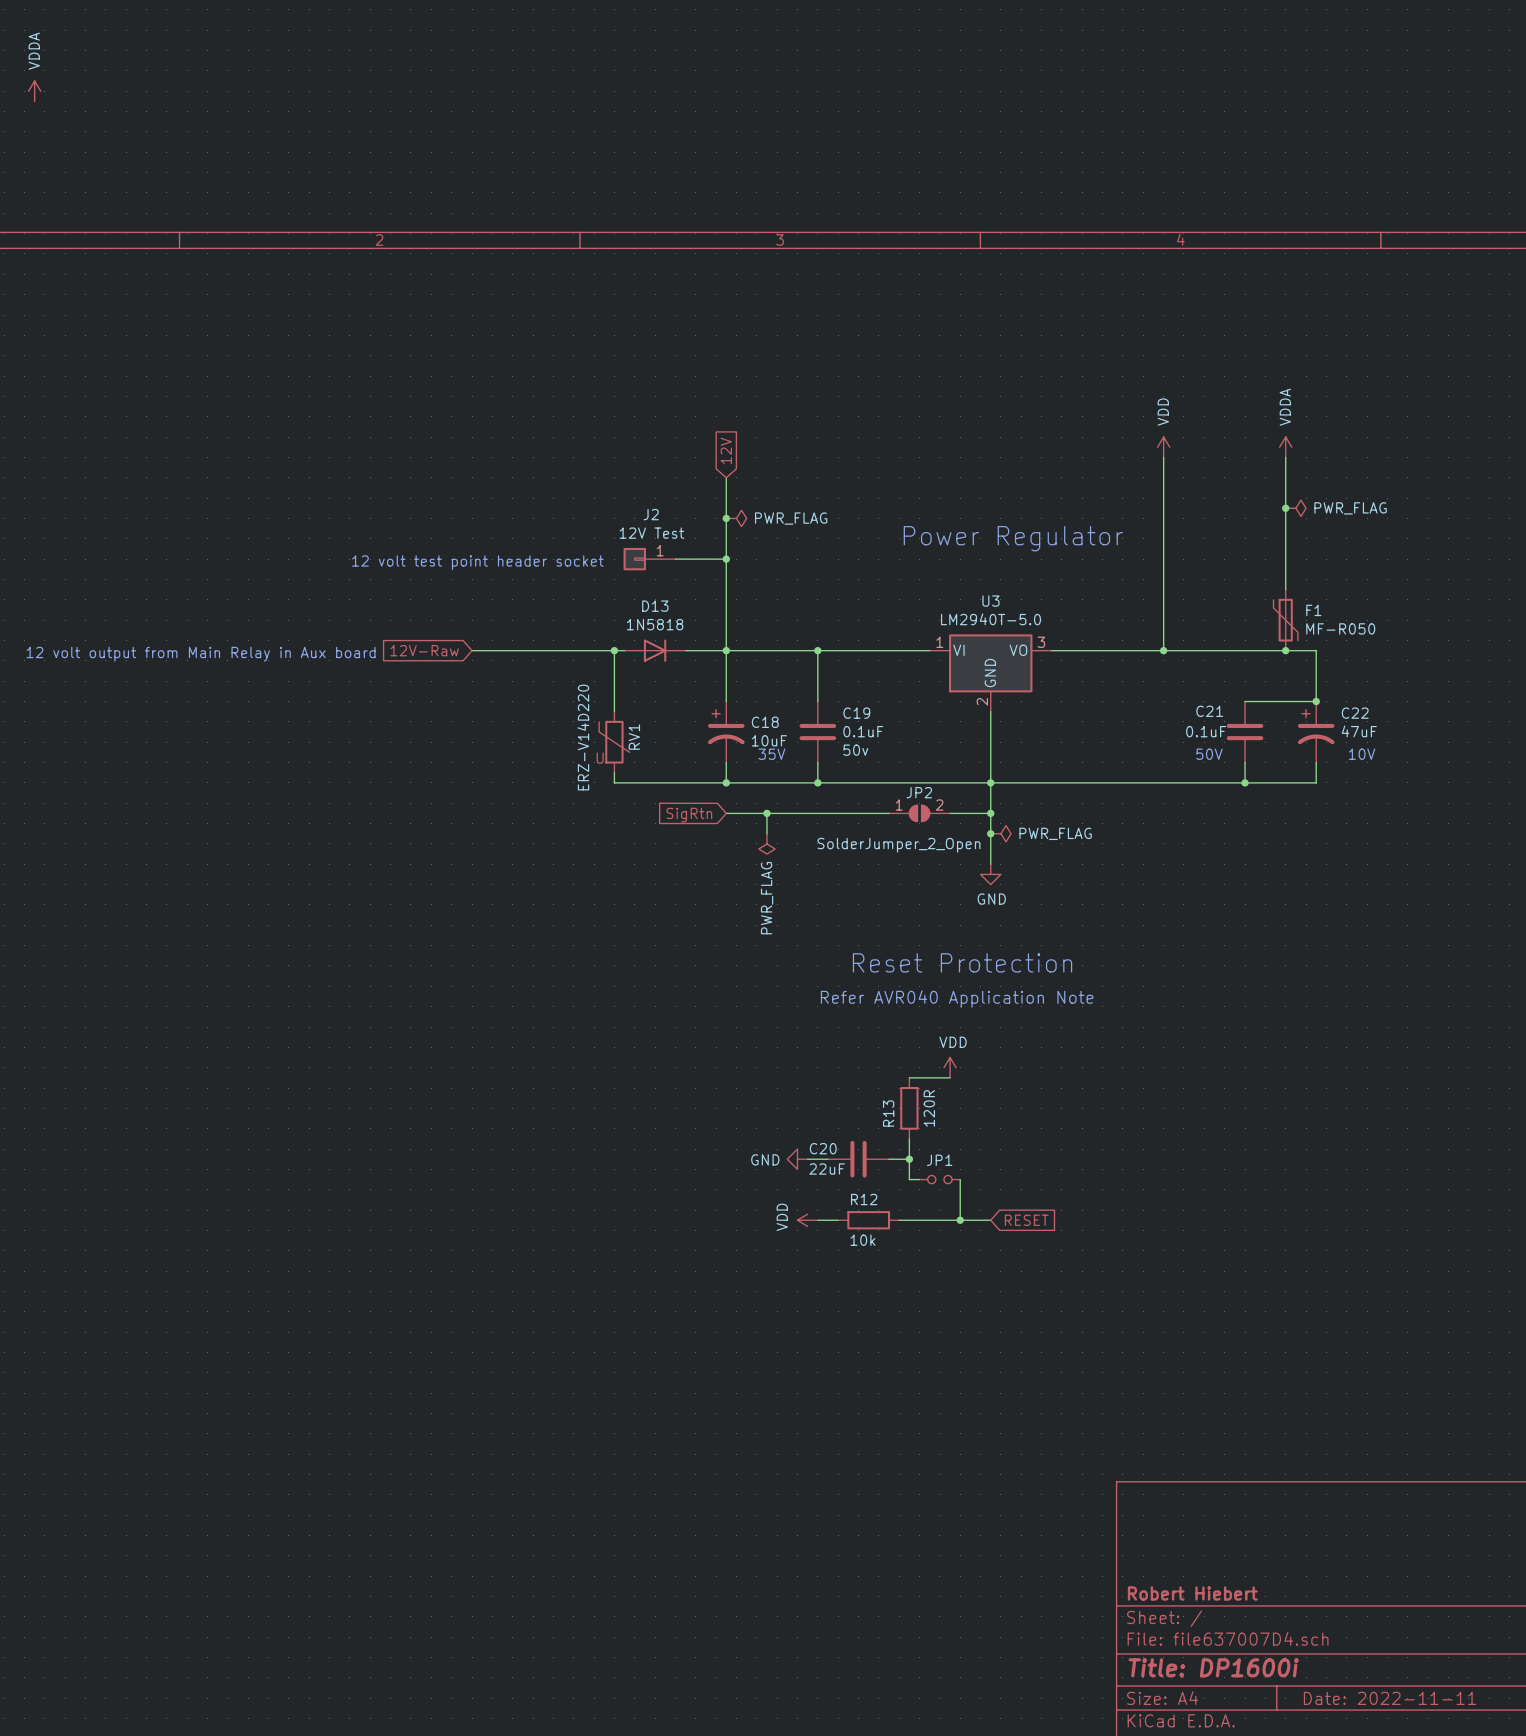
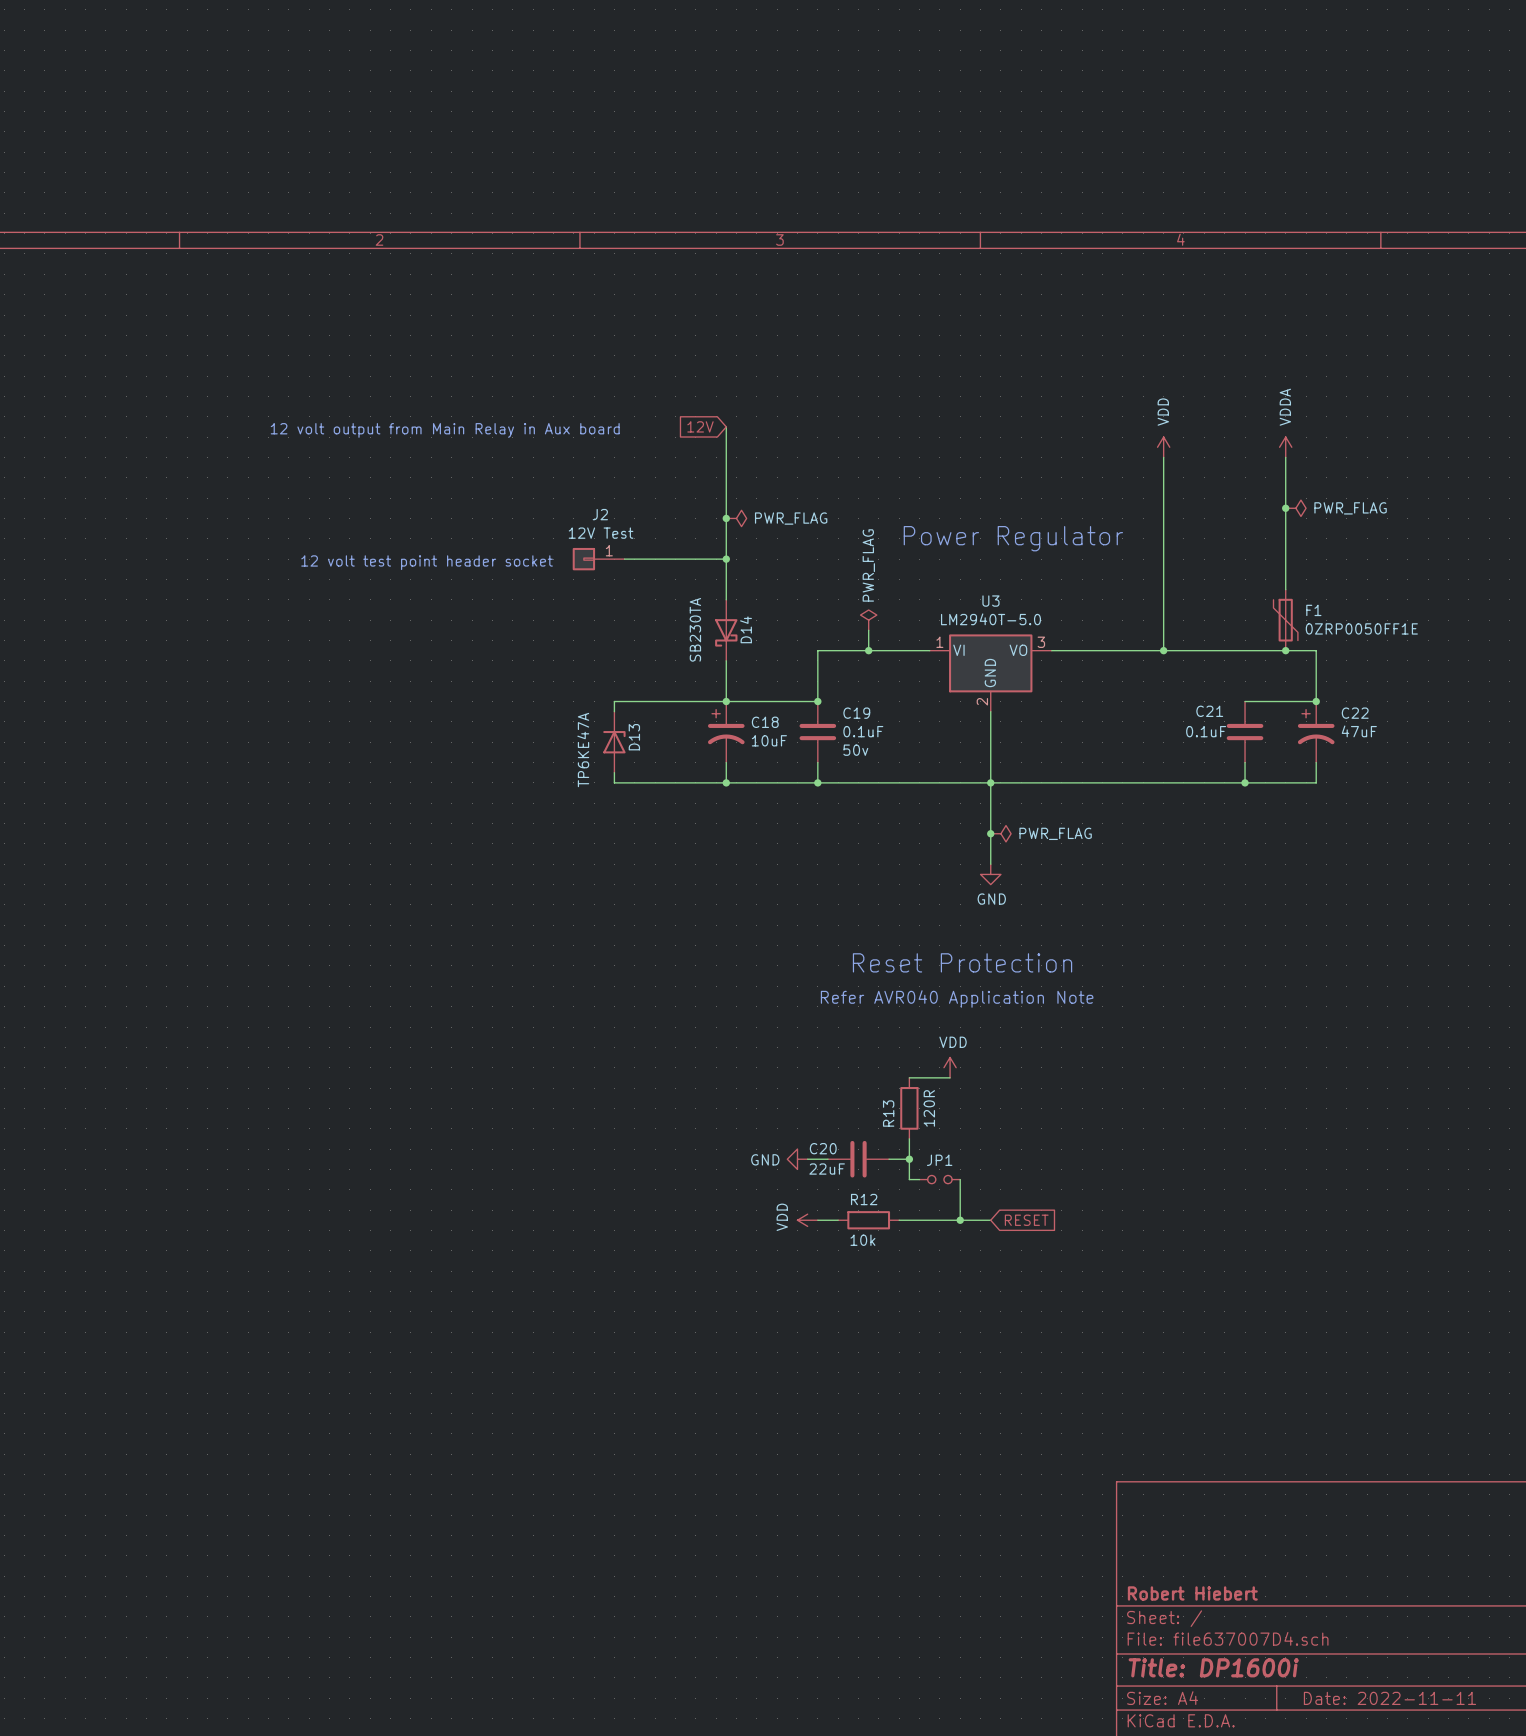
power symbol: VDDA (34, 91) -> none
wire: none -> (726, 426) (726, 477)
text: none -> 12 volt output from Main Relay in Aux board (445, 430)
global label rotation: 0° (726, 450) -> 90° counterclockwise (700, 426)
J2 position: (649, 559) -> (598, 559)
text position: 12 volt test point header socket (477, 562) -> 12 volt test point header socket (427, 562)
D13 name position: D13 (655, 606) -> D13 (634, 737)
power symbol: none -> PWR_FLAG (868, 620)
D13 value: 1N5818 (655, 624) -> TP6KE47A (583, 750)
F1 value: MF-R050 (1340, 628) -> 0ZRP0050FF1E (1361, 628)
D14: none -> SB230TA (726, 630)
wire: none -> (868, 630) (868, 650)
D13 symbol: [624, 639, 686, 662] -> [603, 711, 626, 773]
global label: 12V-Raw (424, 650) -> none
wire: (472, 650) (624, 650) -> none
wire: (614, 650) (614, 701) -> (817, 701) (614, 701)
junction: (614, 650) -> none
wire: (685, 650) (817, 650) -> none
junction: (726, 650) -> none
junction: (817, 650) -> none
junction: none -> (868, 650)
text: 12 volt output from Main Relay in Aux board (201, 654) -> none
junction: none -> (726, 701)
junction: none -> (817, 701)
RV1: ERZ-V14D220 (614, 742) -> none
text: 35V (771, 754) -> none
text: 50V (1209, 754) -> none
text: 10V (1362, 754) -> none
wire: (726, 813) (889, 813) -> none
wire: (766, 813) (766, 833) -> none
junction: (766, 813) -> none
JP2: SolderJumper_2_Open (919, 813) -> none
wire: (950, 813) (990, 813) -> none
junction: (990, 813) -> none
global label: SigRtn (689, 815) -> none
power symbol: PWR_FLAG (766, 843) -> none

